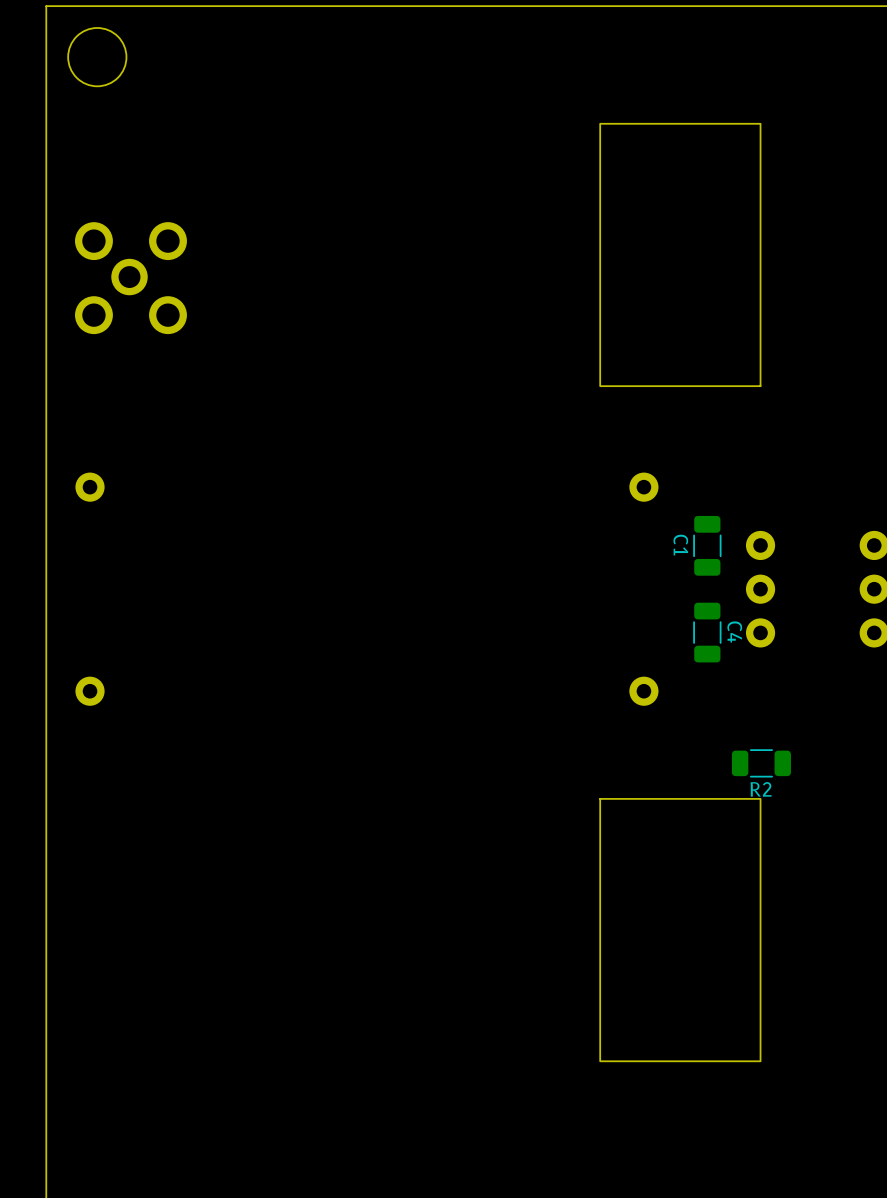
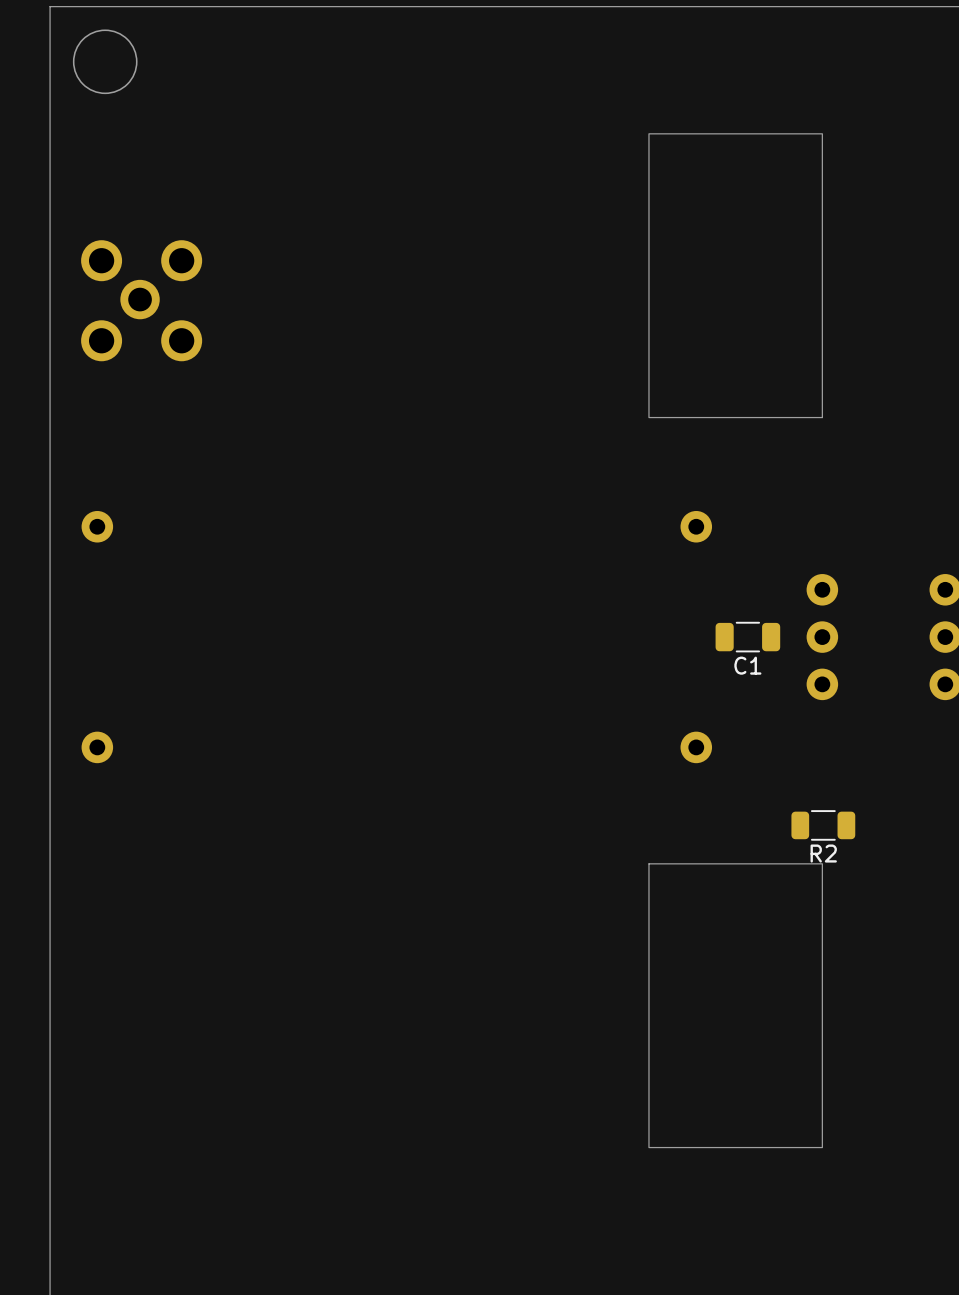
C1 name position: C1 (680, 545) -> C1 (747, 665)
C1 rotation: 0° (707, 545) -> 90° clockwise (747, 637)
C1 position: (707, 545) -> (747, 637)
C4: (707, 632) -> none

